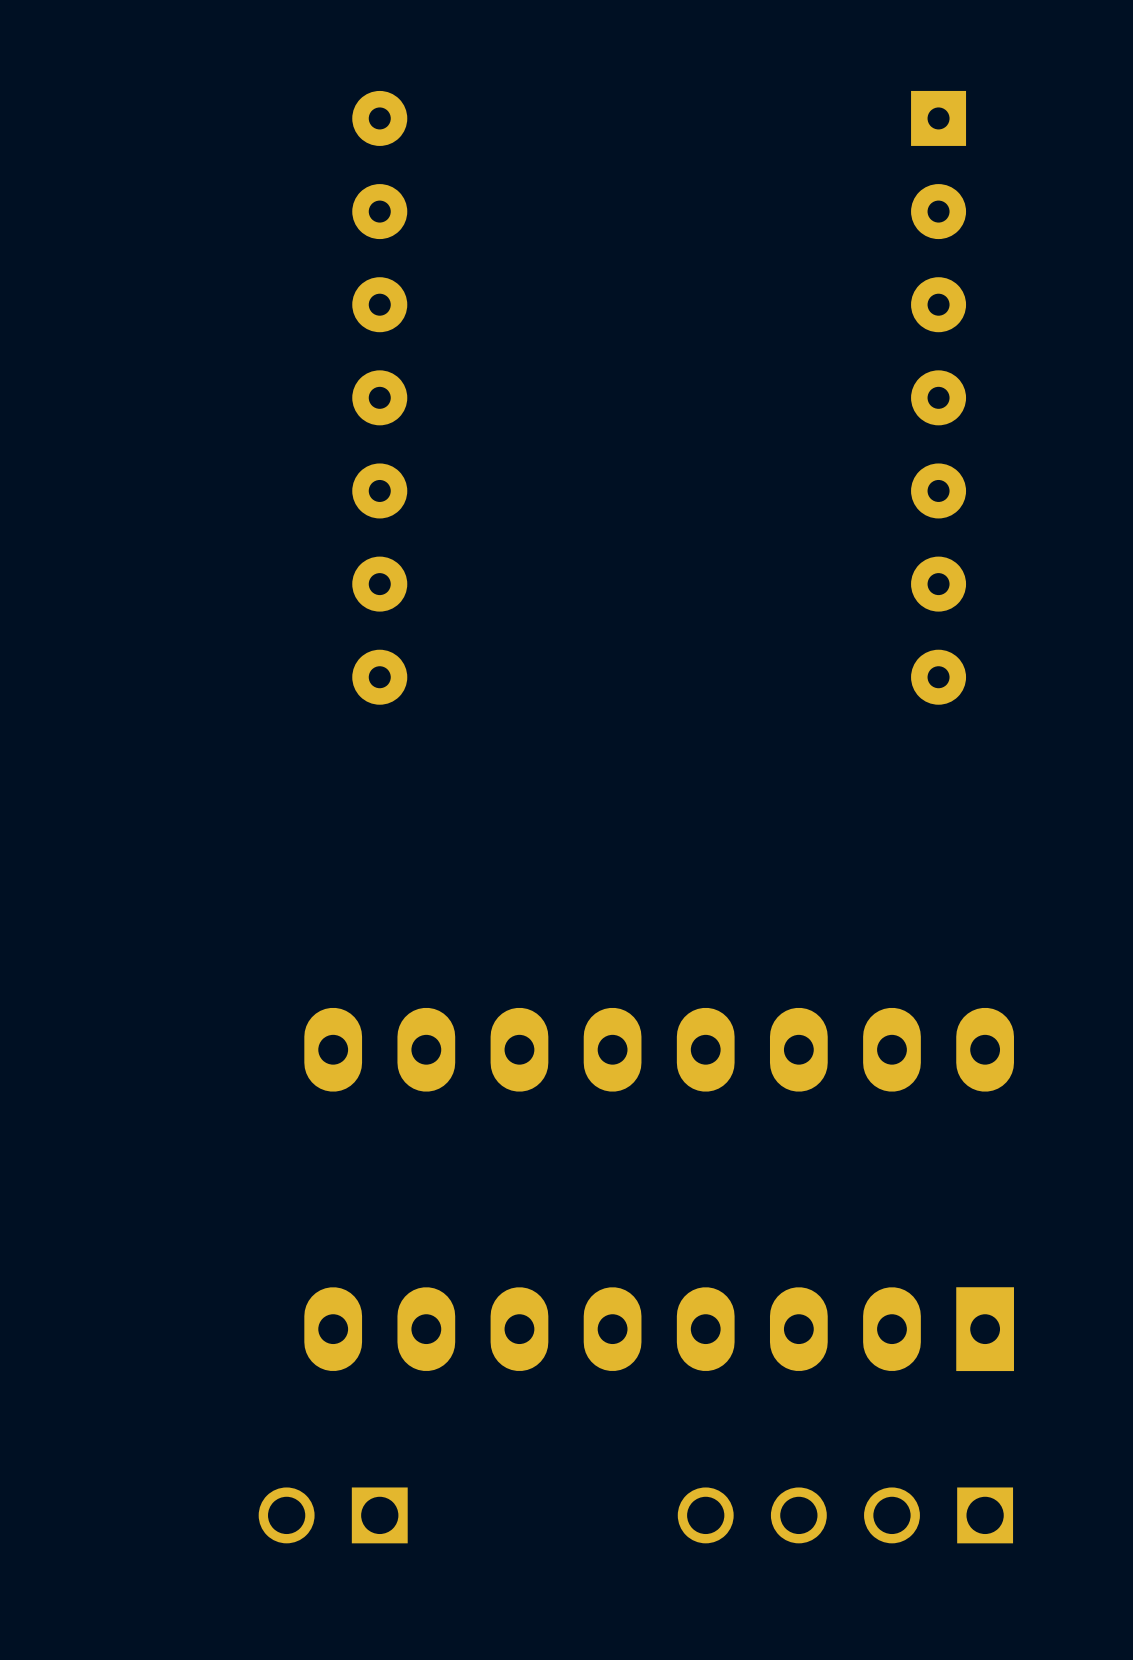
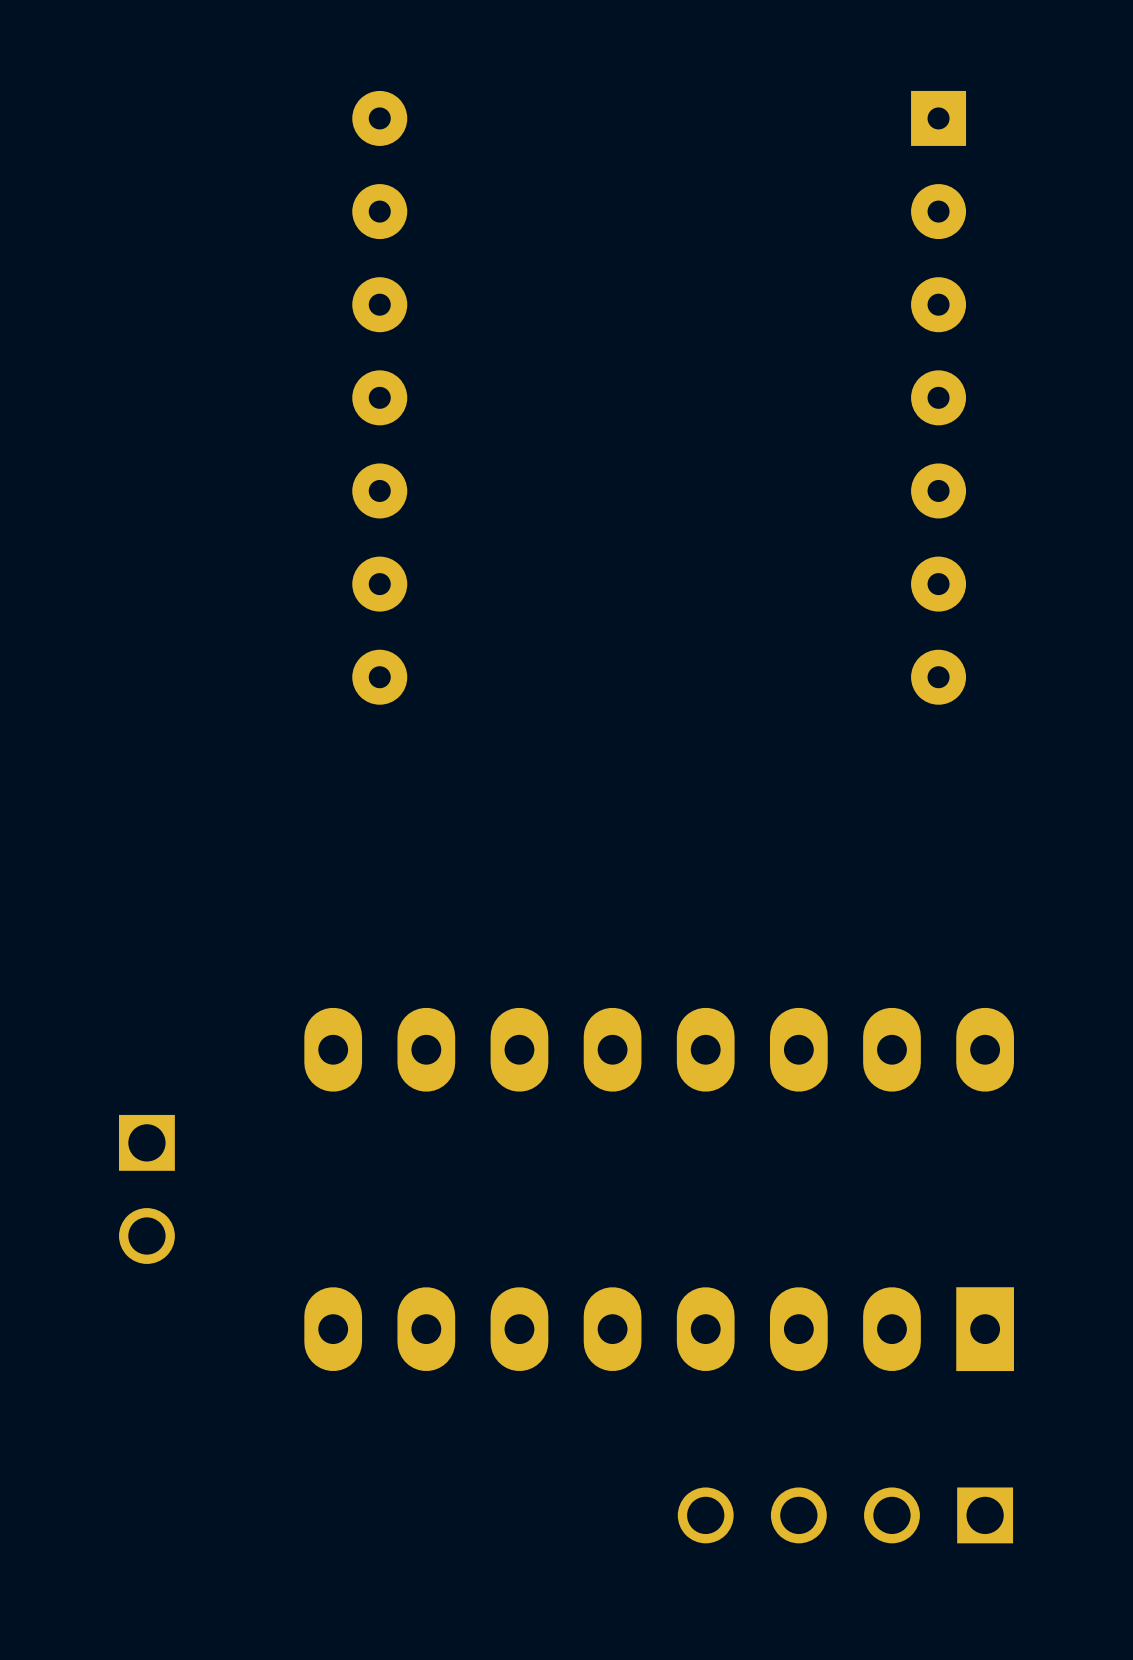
part rotation: 0° (333, 1515) -> 90° counterclockwise (146, 1189)
part position: (333, 1515) -> (146, 1189)

